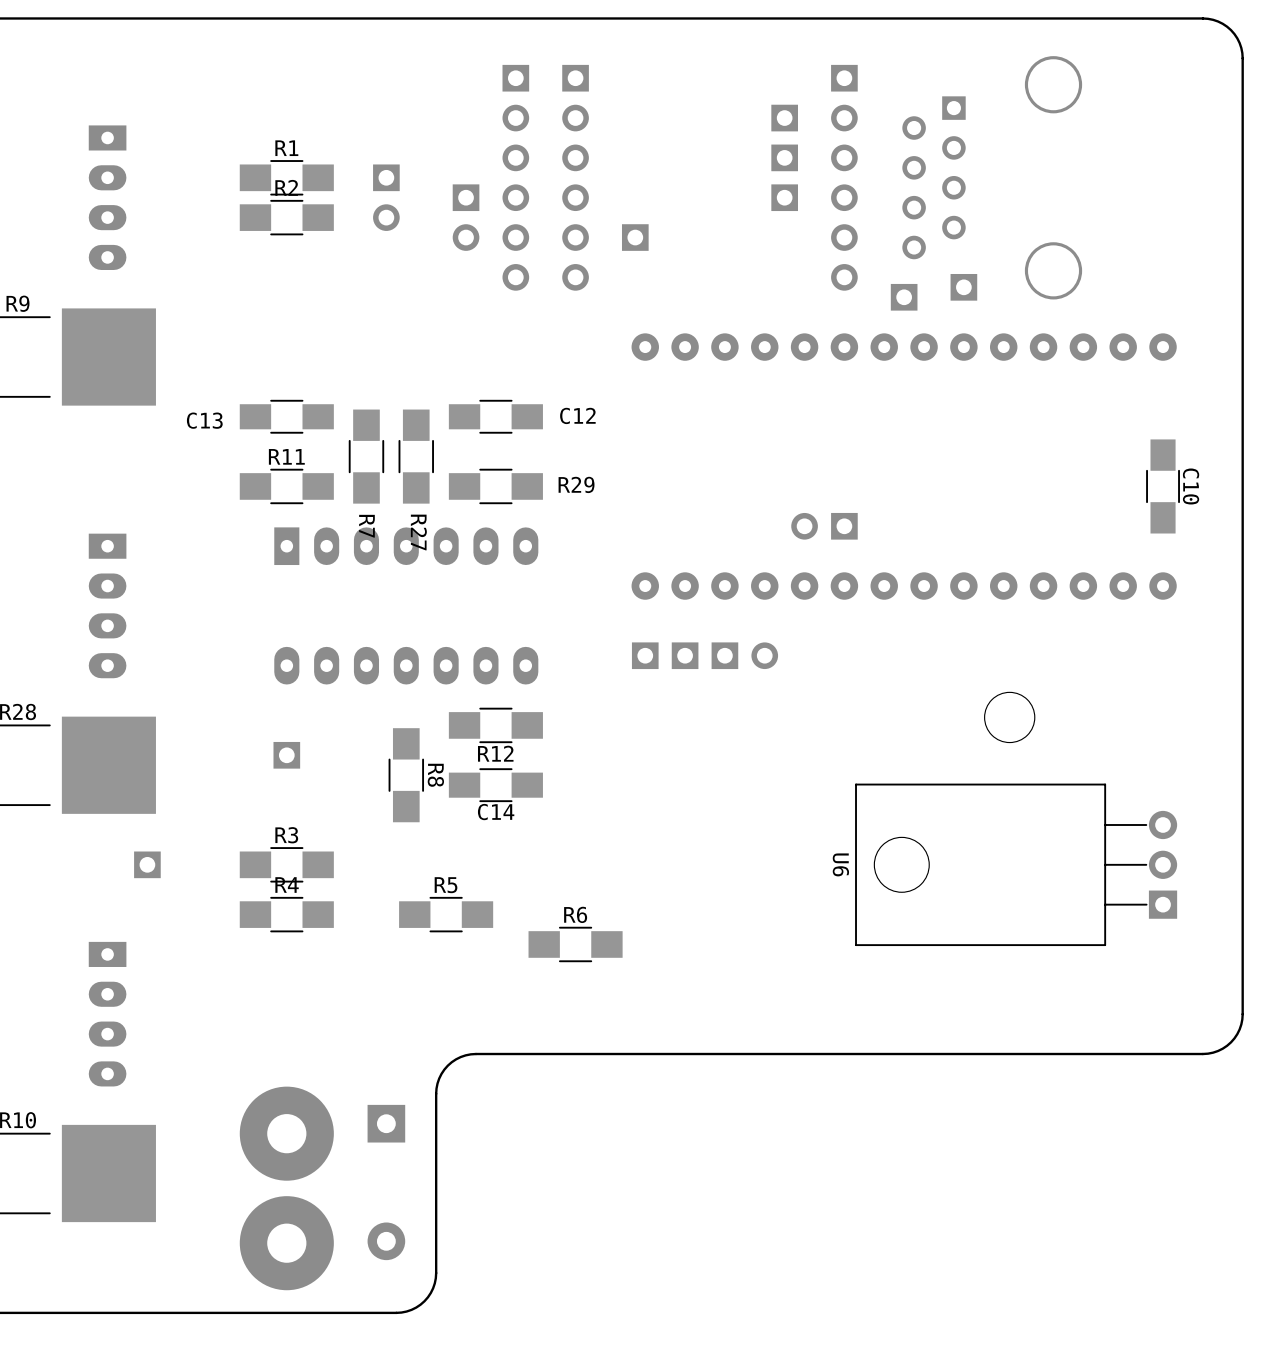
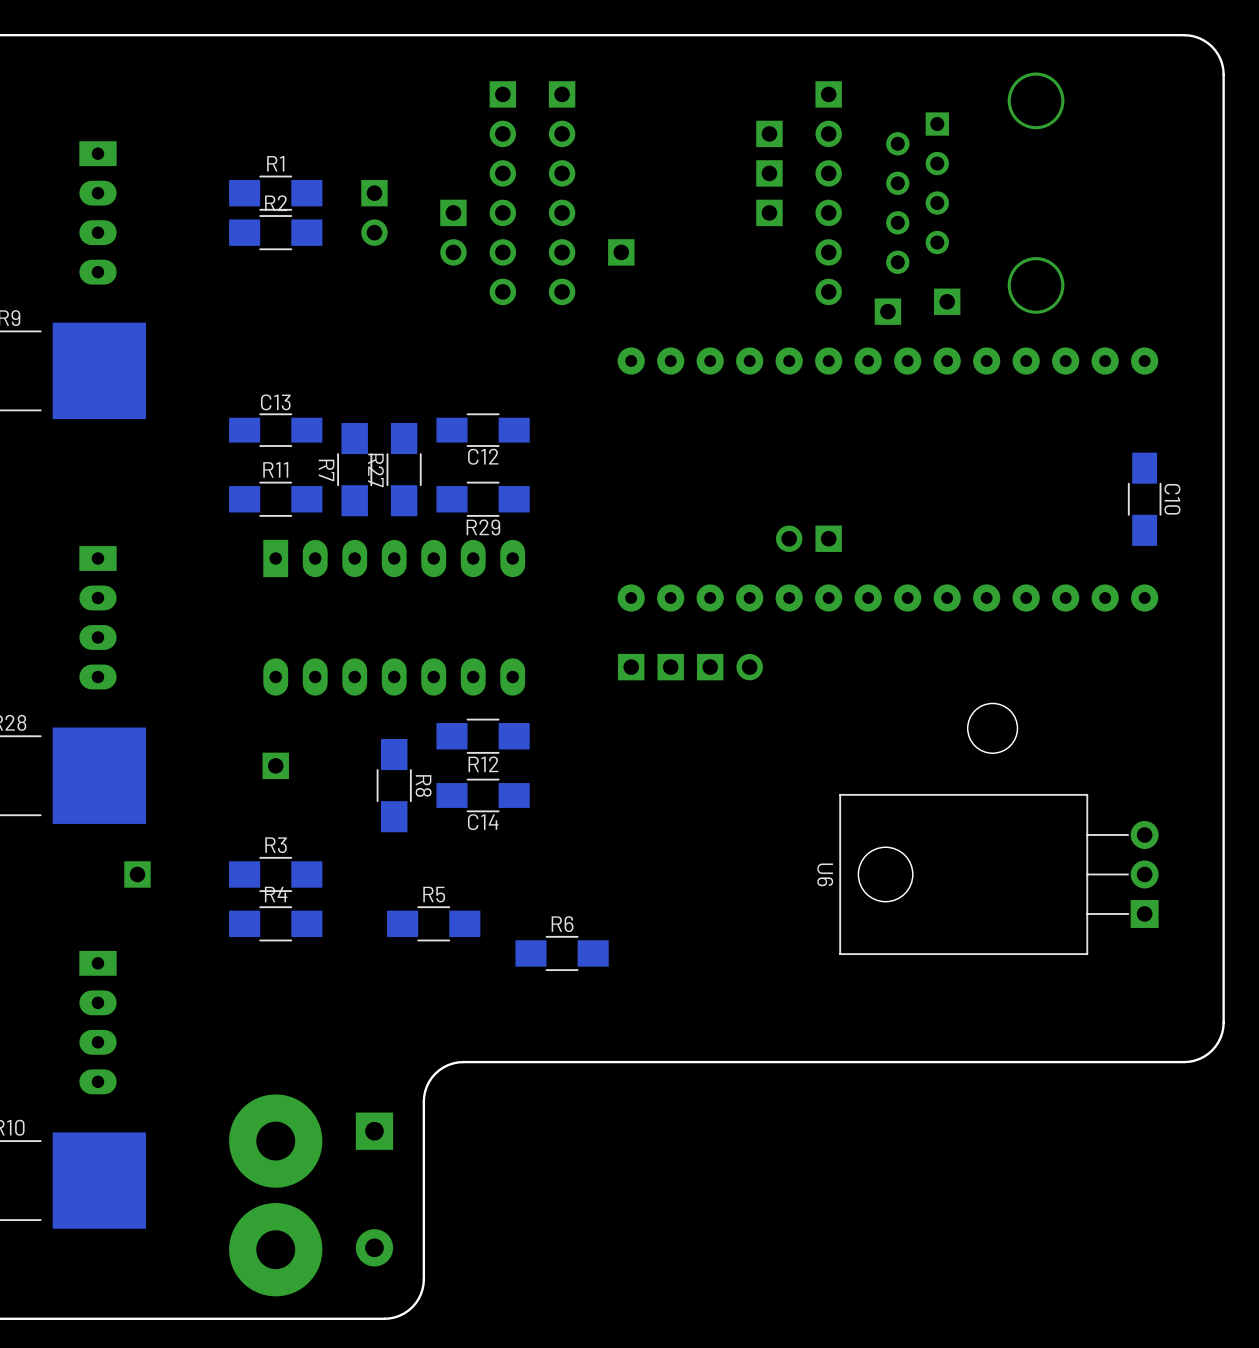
C12 name position: C12 (577, 415) -> C12 (483, 456)
C13 name position: C13 (204, 420) -> C13 (275, 402)
R29 name position: R29 (576, 484) -> R29 (483, 527)
R7 name position: R7 (366, 526) -> R7 (326, 470)
R27 name position: R27 (418, 532) -> R27 (376, 470)

